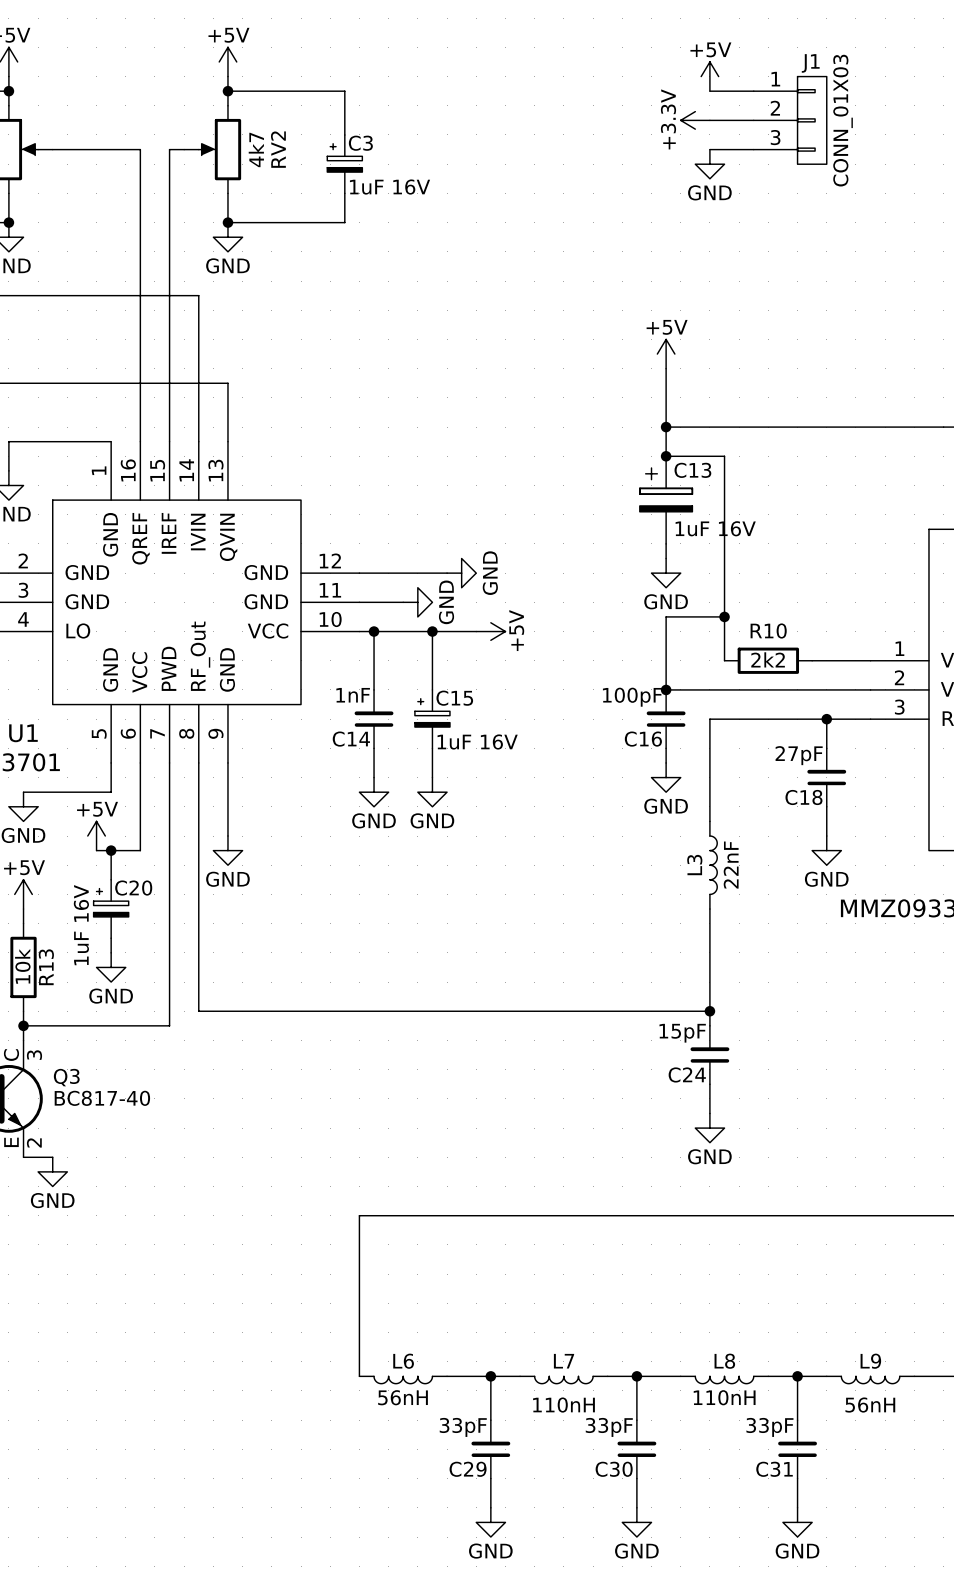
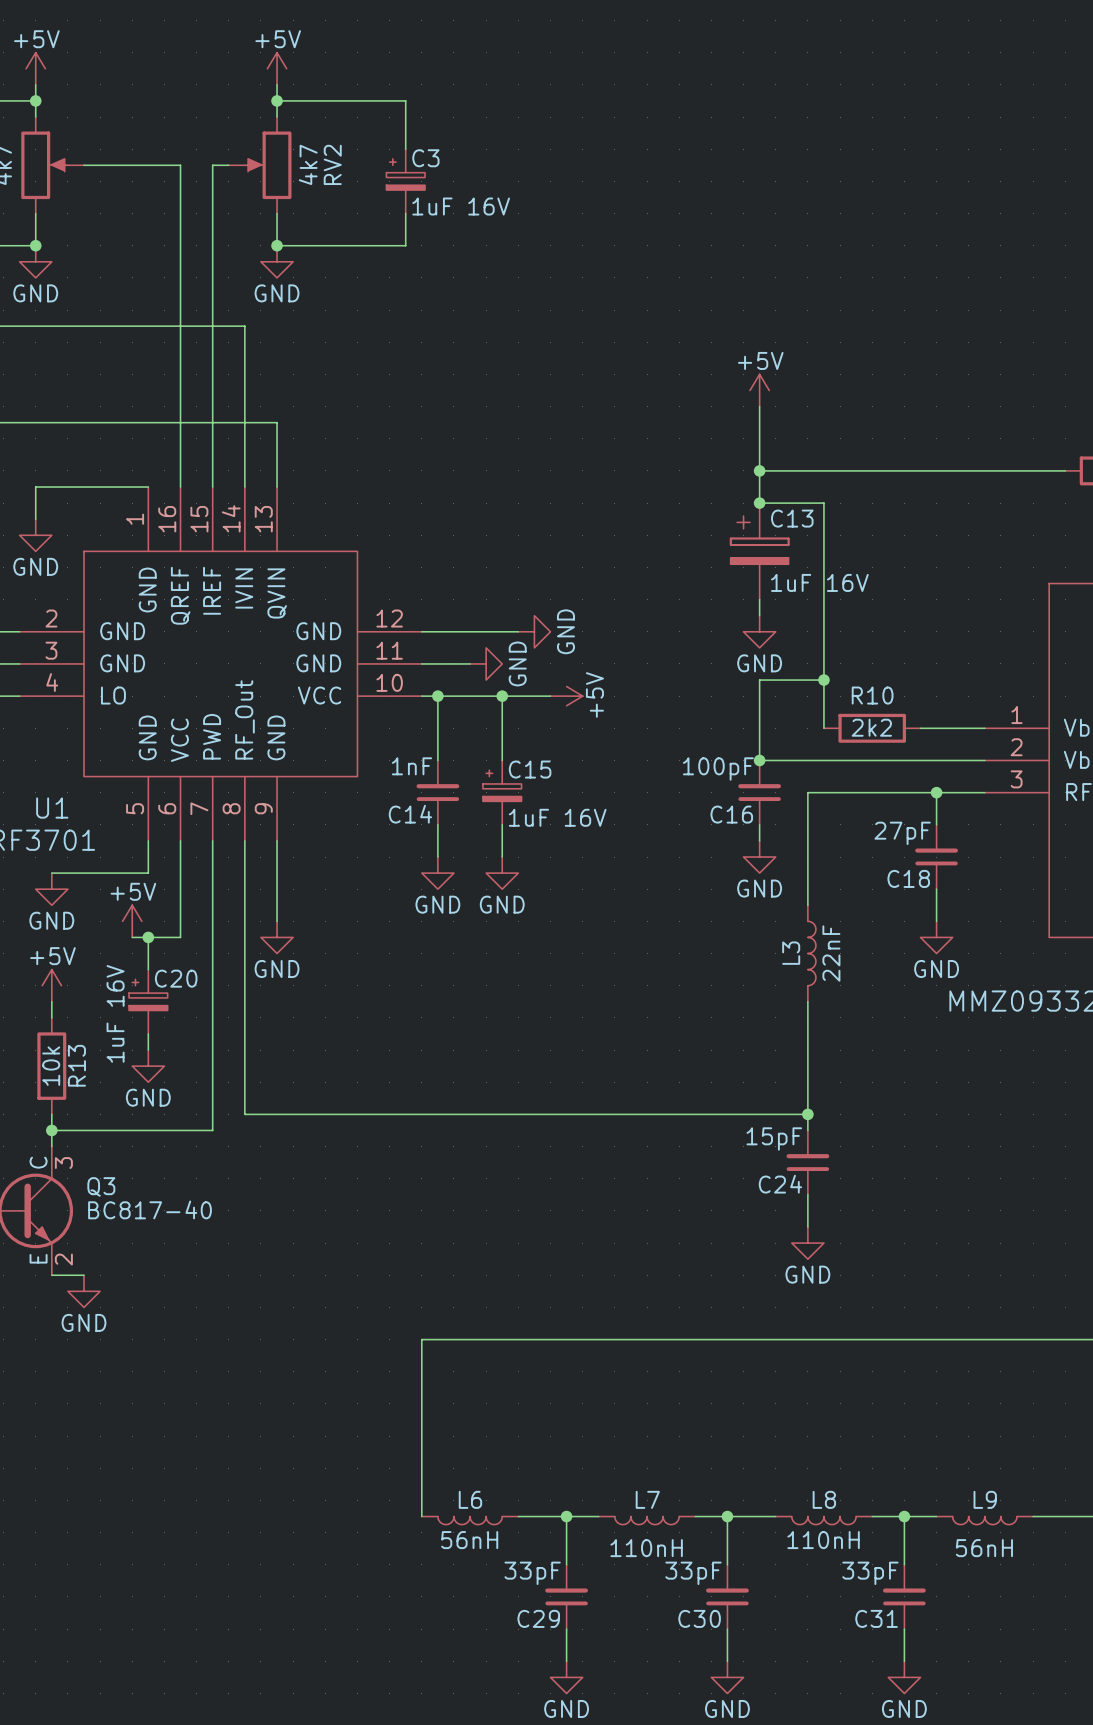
power symbol: +5V (709, 76) -> none
wire: (709, 91) (753, 91) -> none
power symbol: +3.3V (695, 120) -> none
wire: (709, 120) (753, 120) -> none
J1: CONN_01X03 (790, 120) -> none
wire: (709, 149) (753, 149) -> none
power symbol: GND (709, 164) -> none

